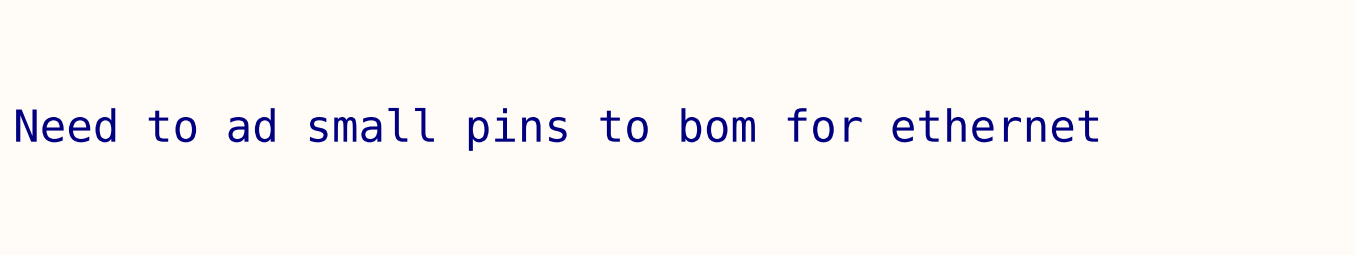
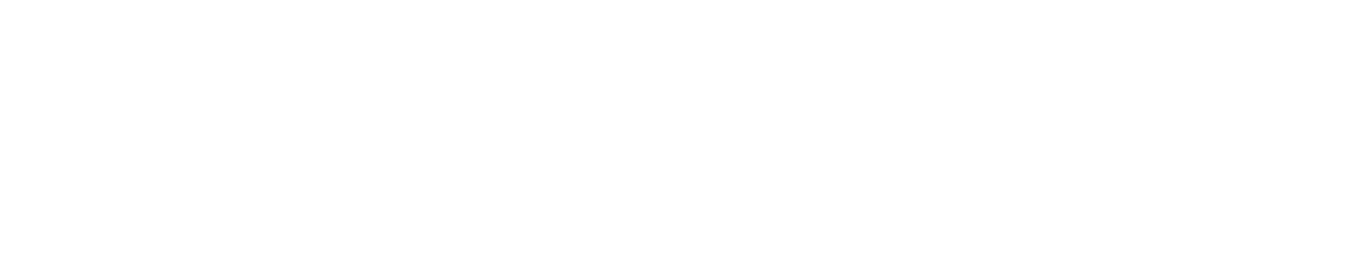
text: Need to ad small pins to bom for ethernet (557, 129) -> none

